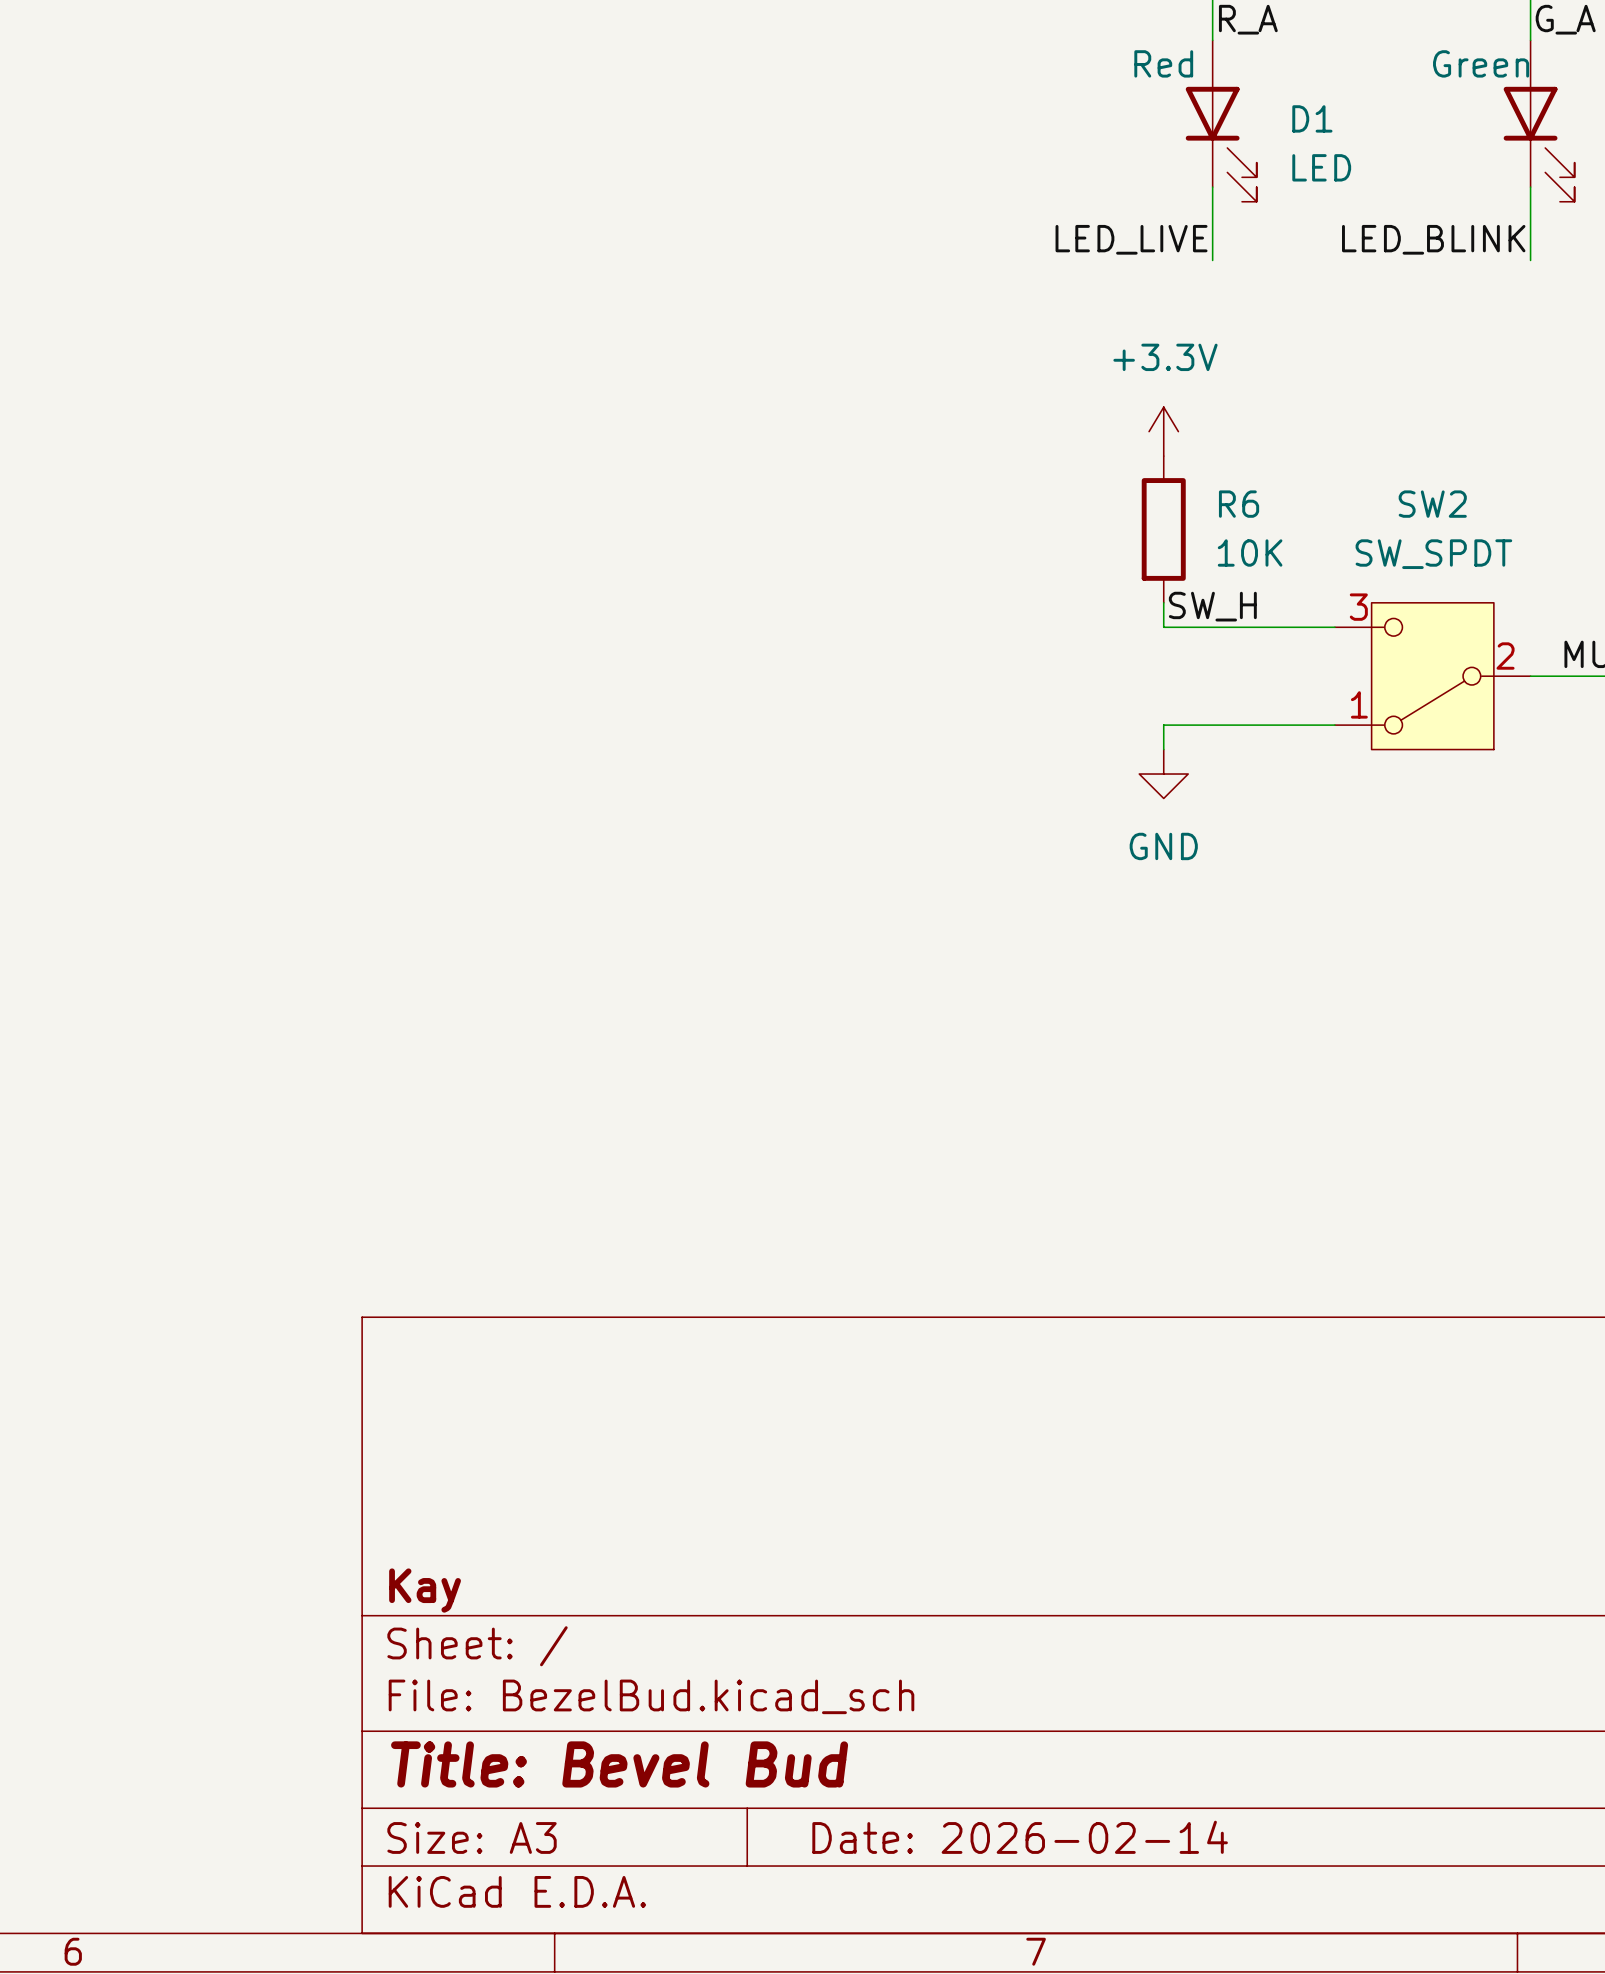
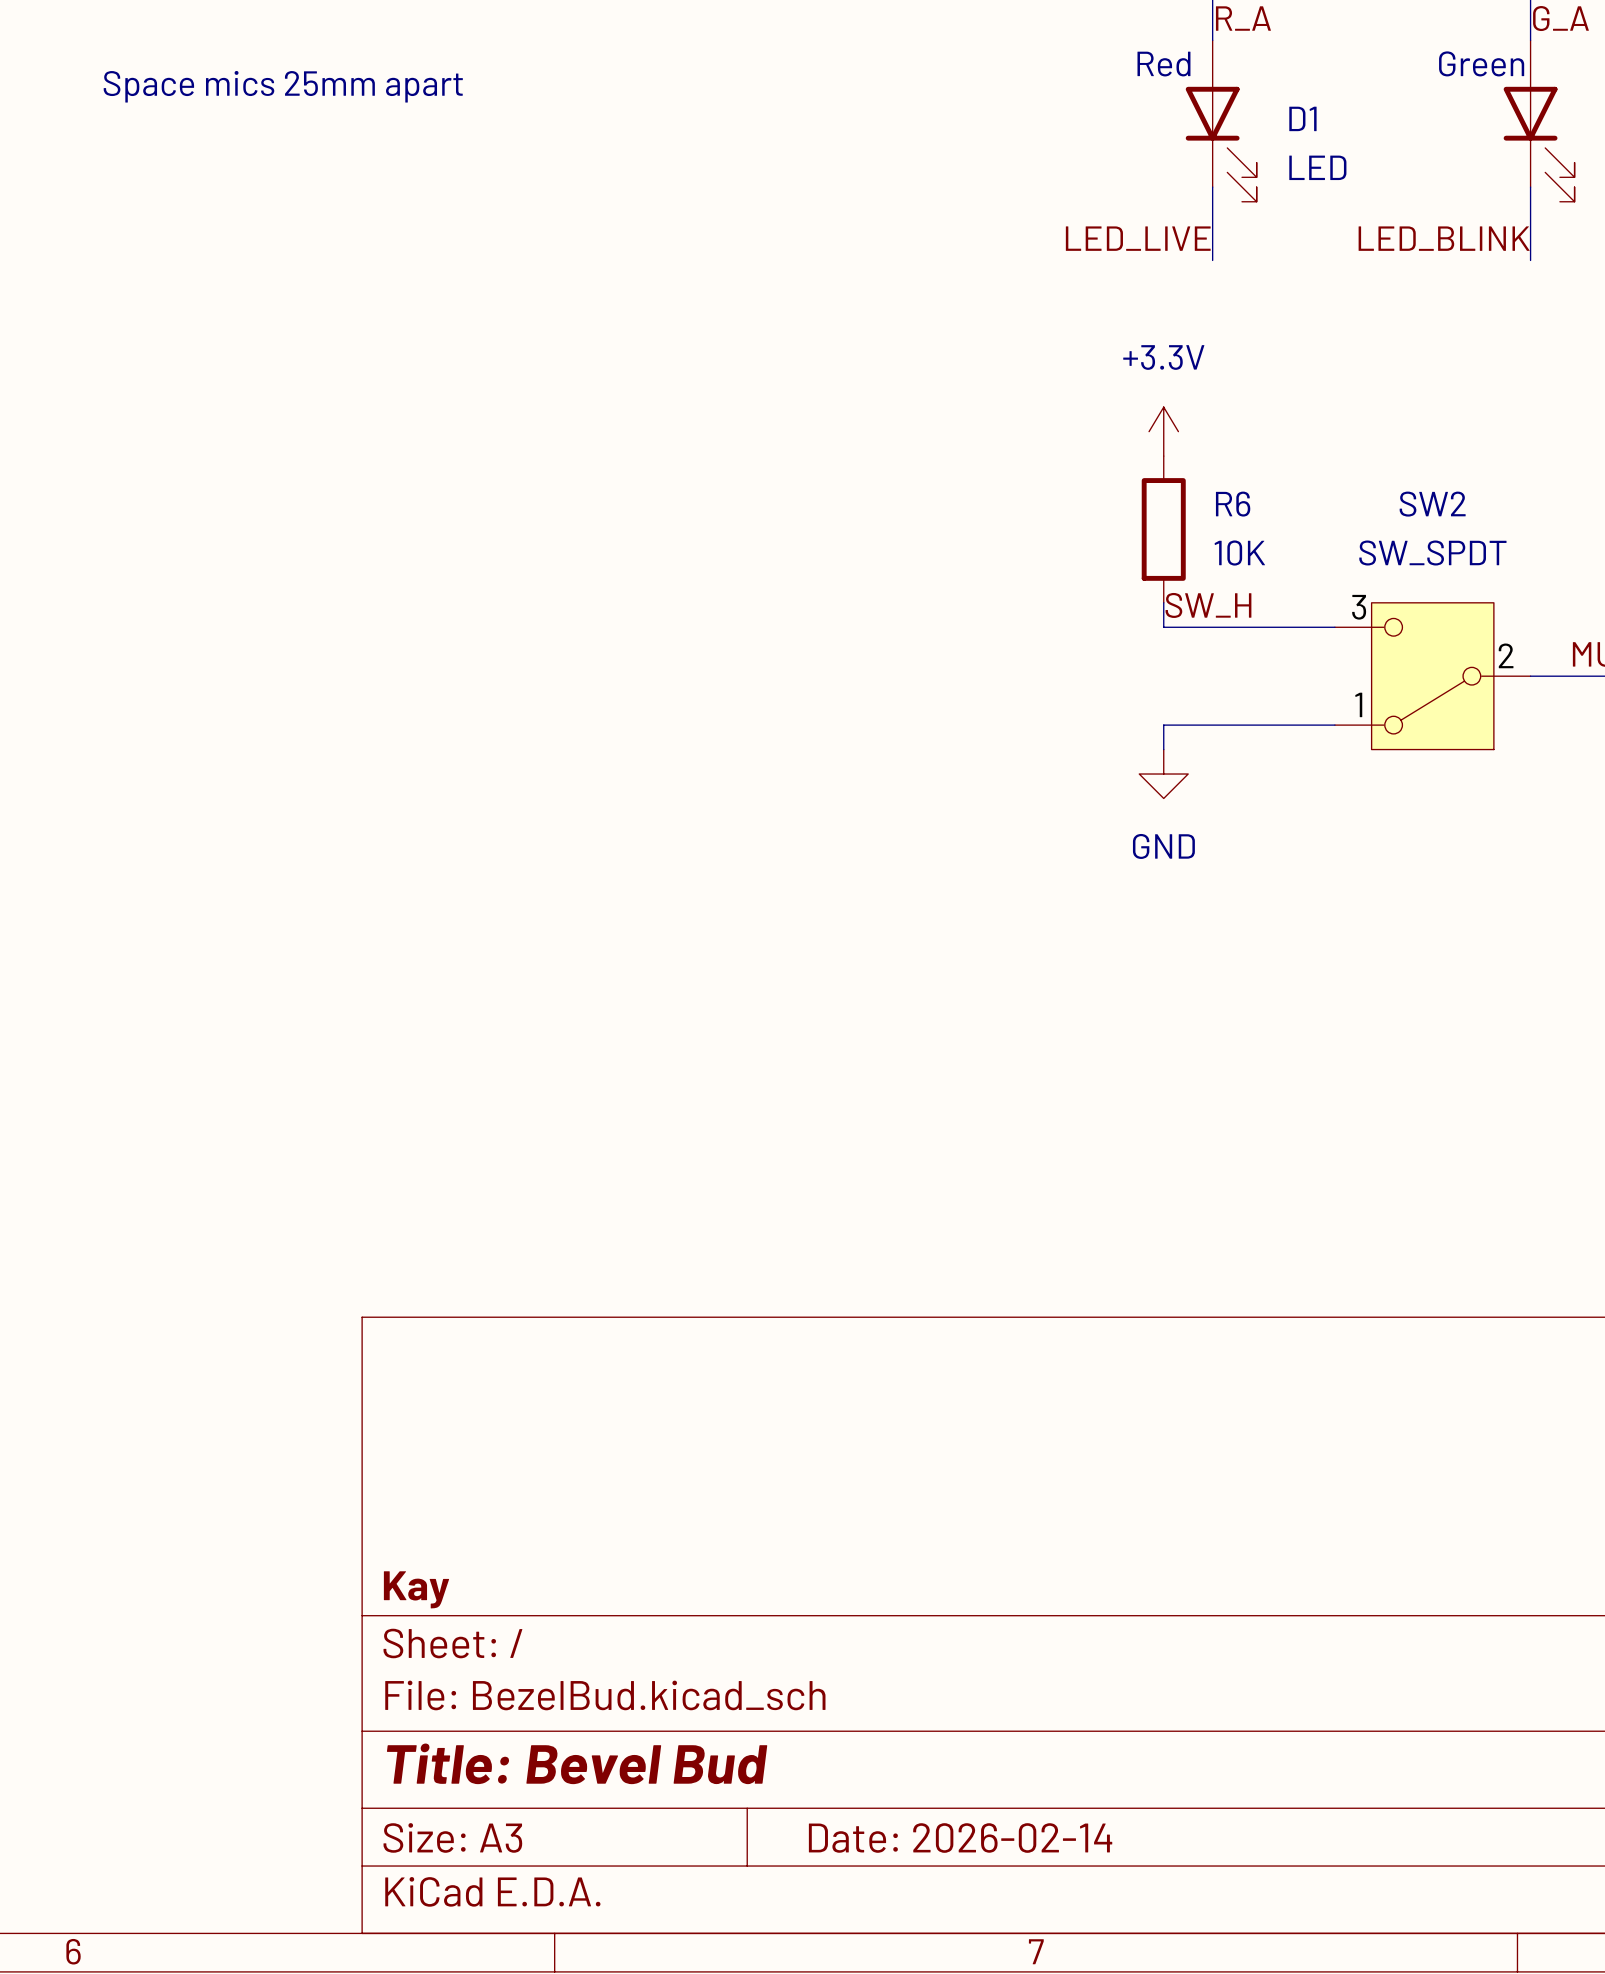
text: none -> Space mics 25mm apart (283, 86)

